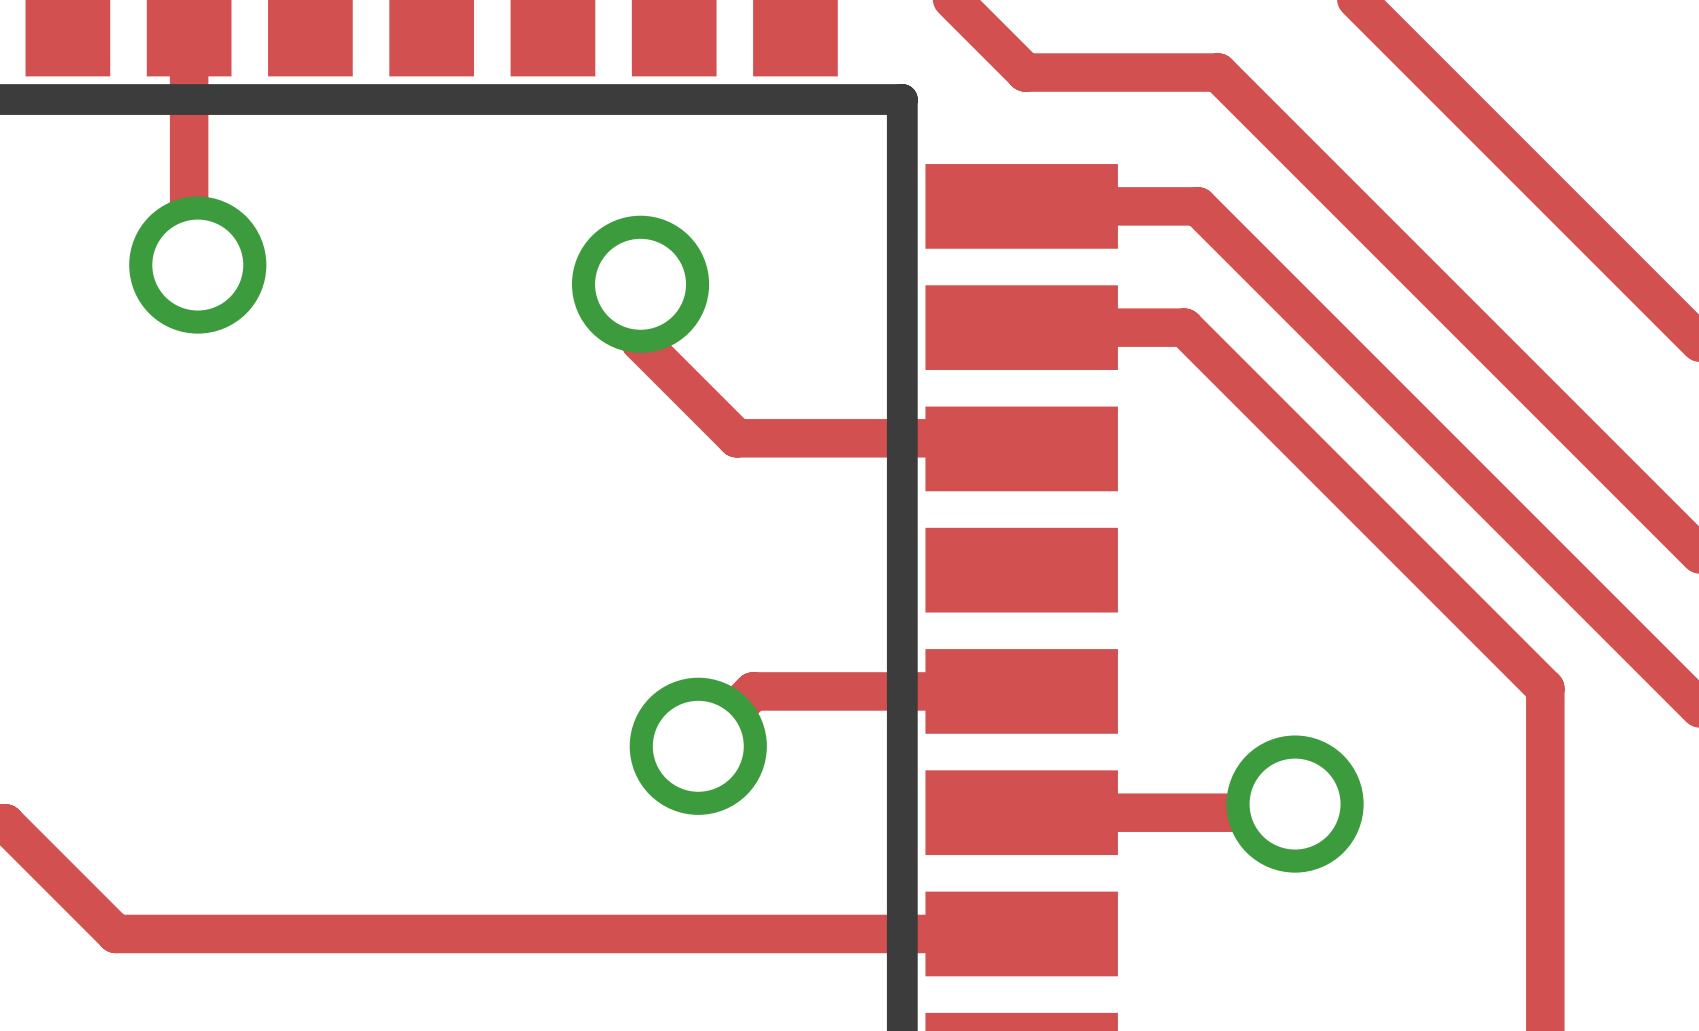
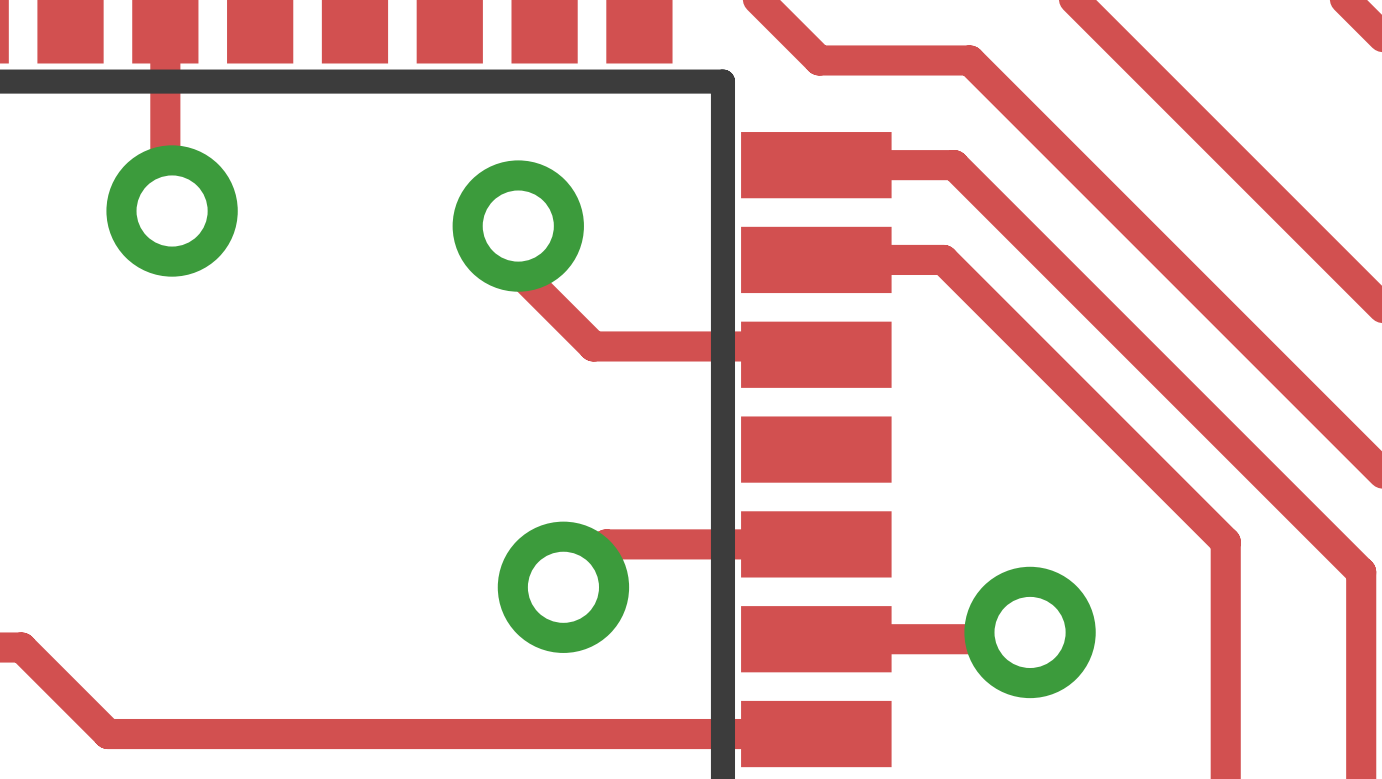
via size: [129, 196, 267, 334] -> [106, 145, 238, 277]
via size: [571, 215, 710, 353] -> [452, 160, 584, 292]
via size: [629, 677, 767, 815] -> [497, 521, 630, 653]
via size: [1226, 735, 1364, 873] -> [964, 566, 1096, 699]

